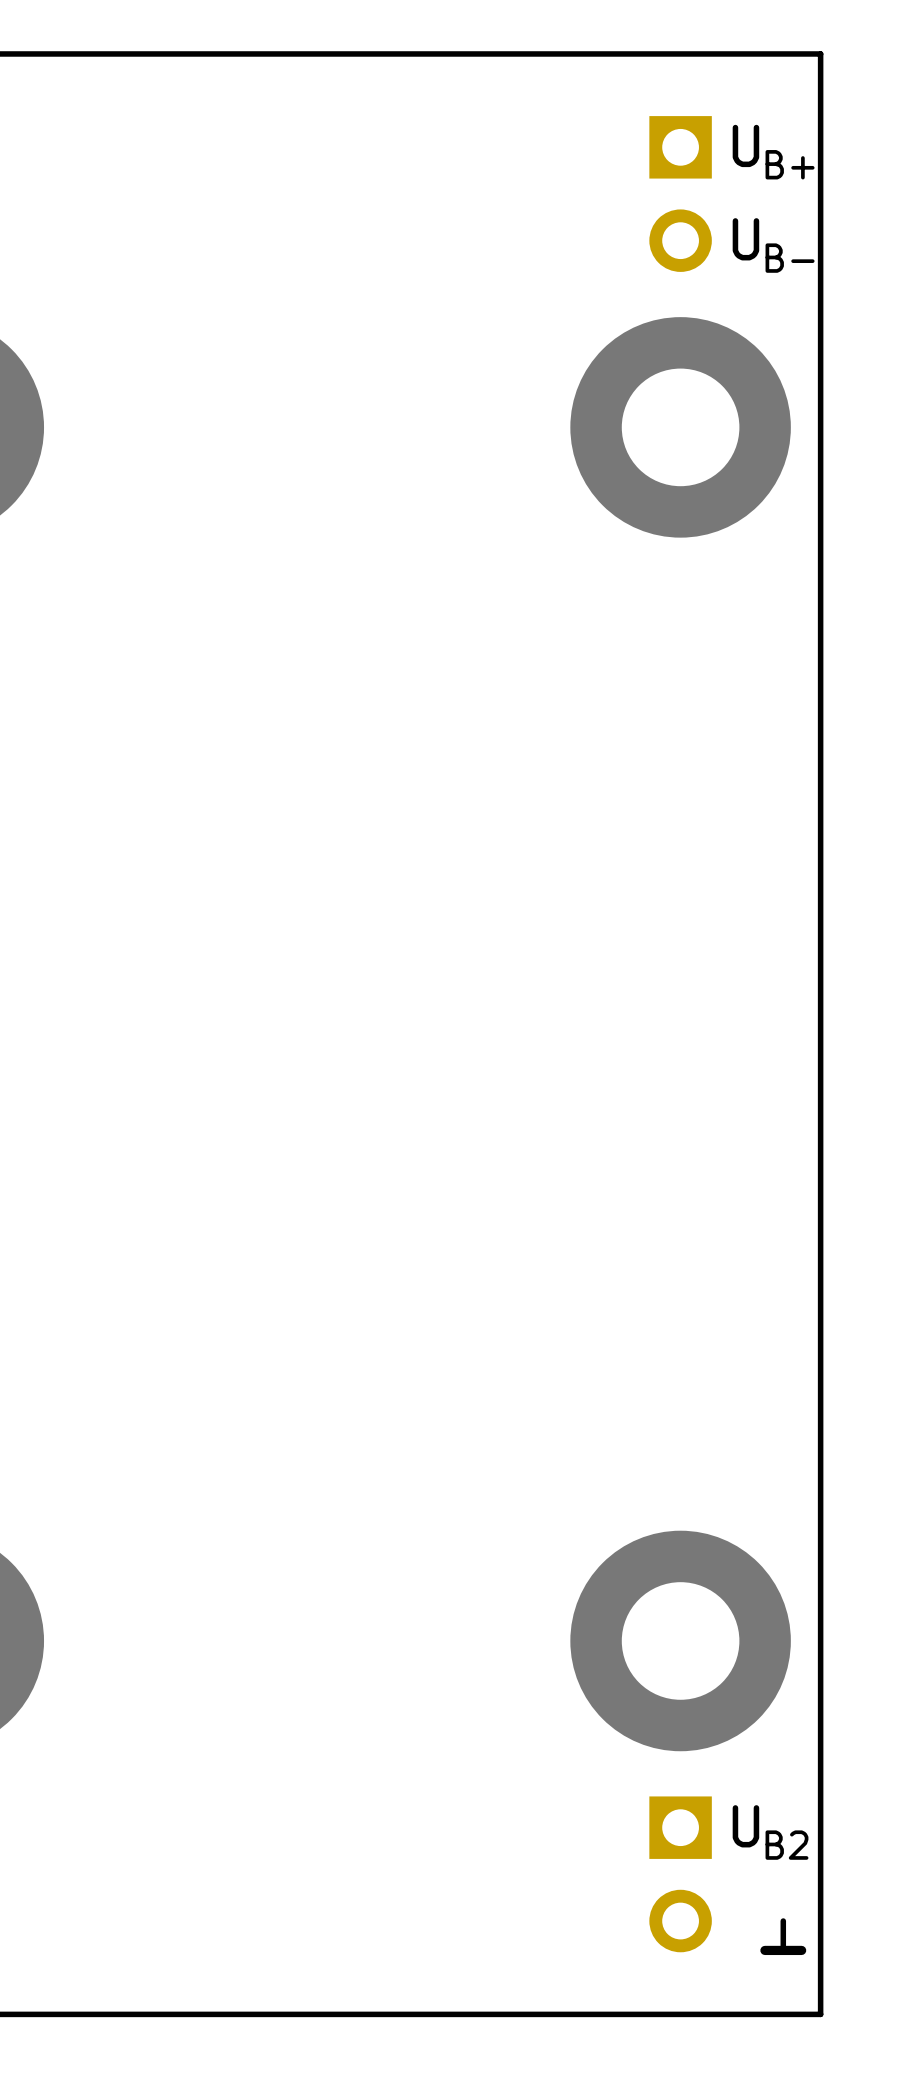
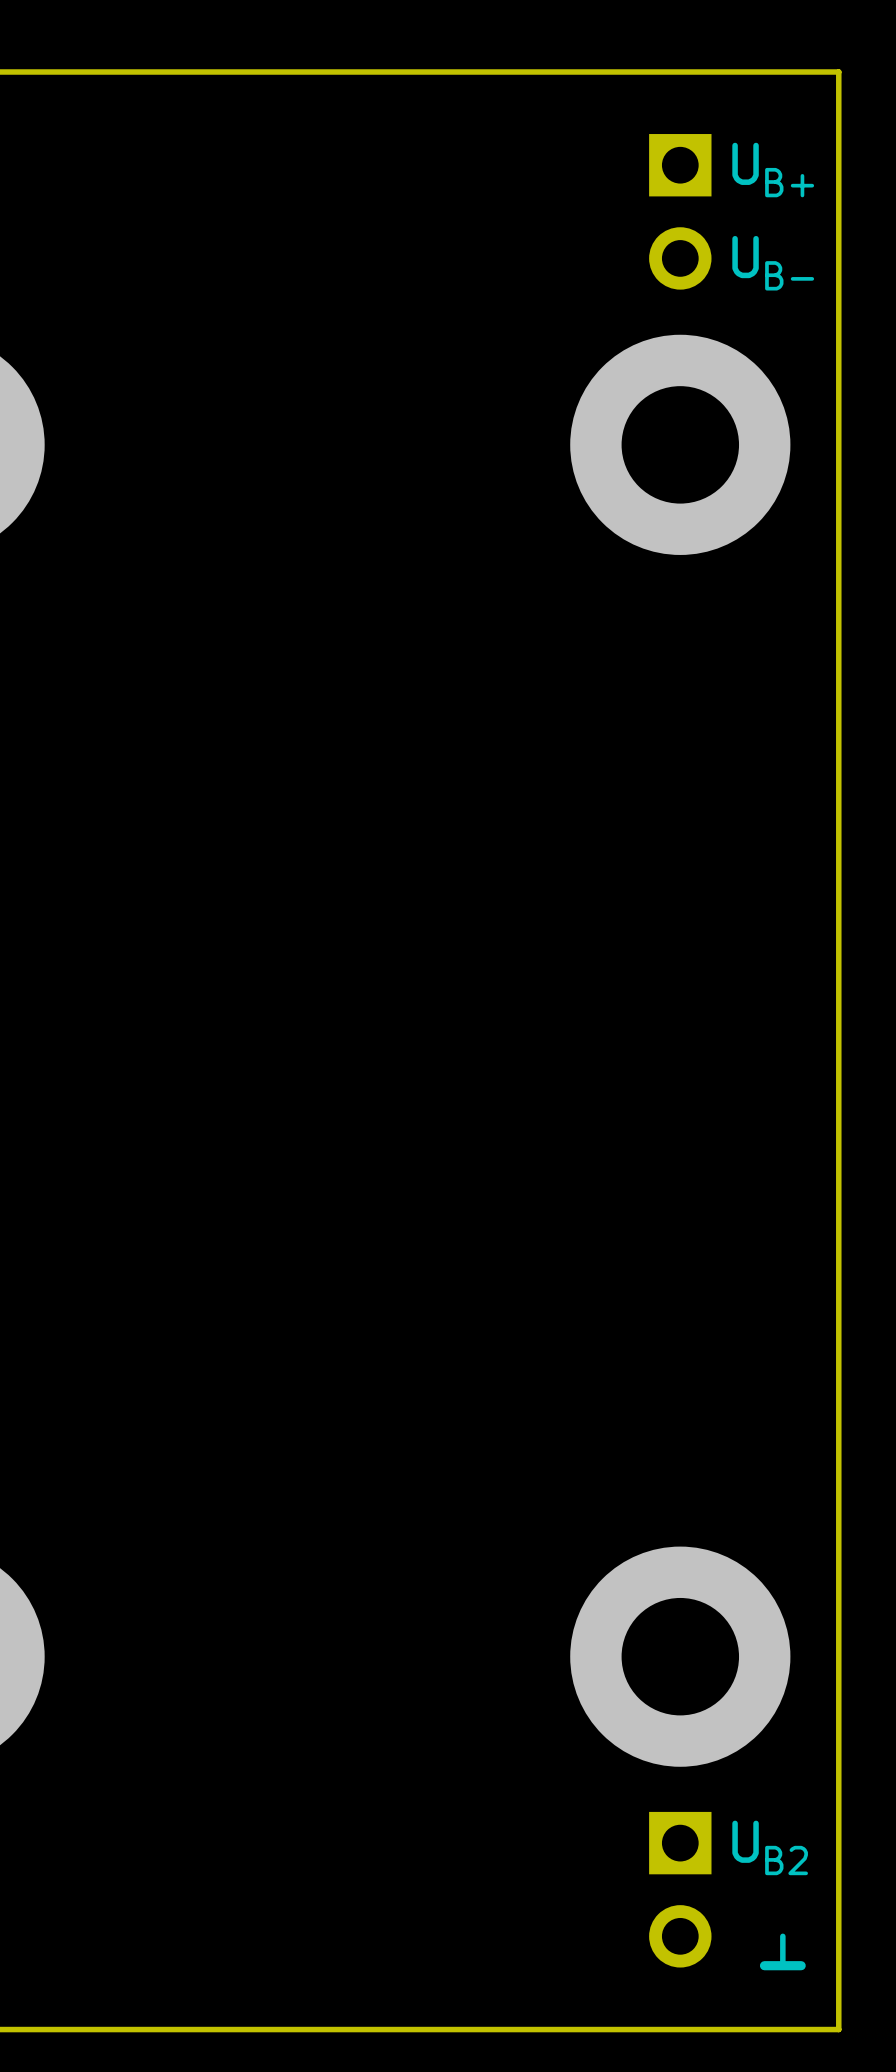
board edge: (820, 53) (820, 2014) -> (820, 72) (838, 72) (838, 2029) (820, 2029)

